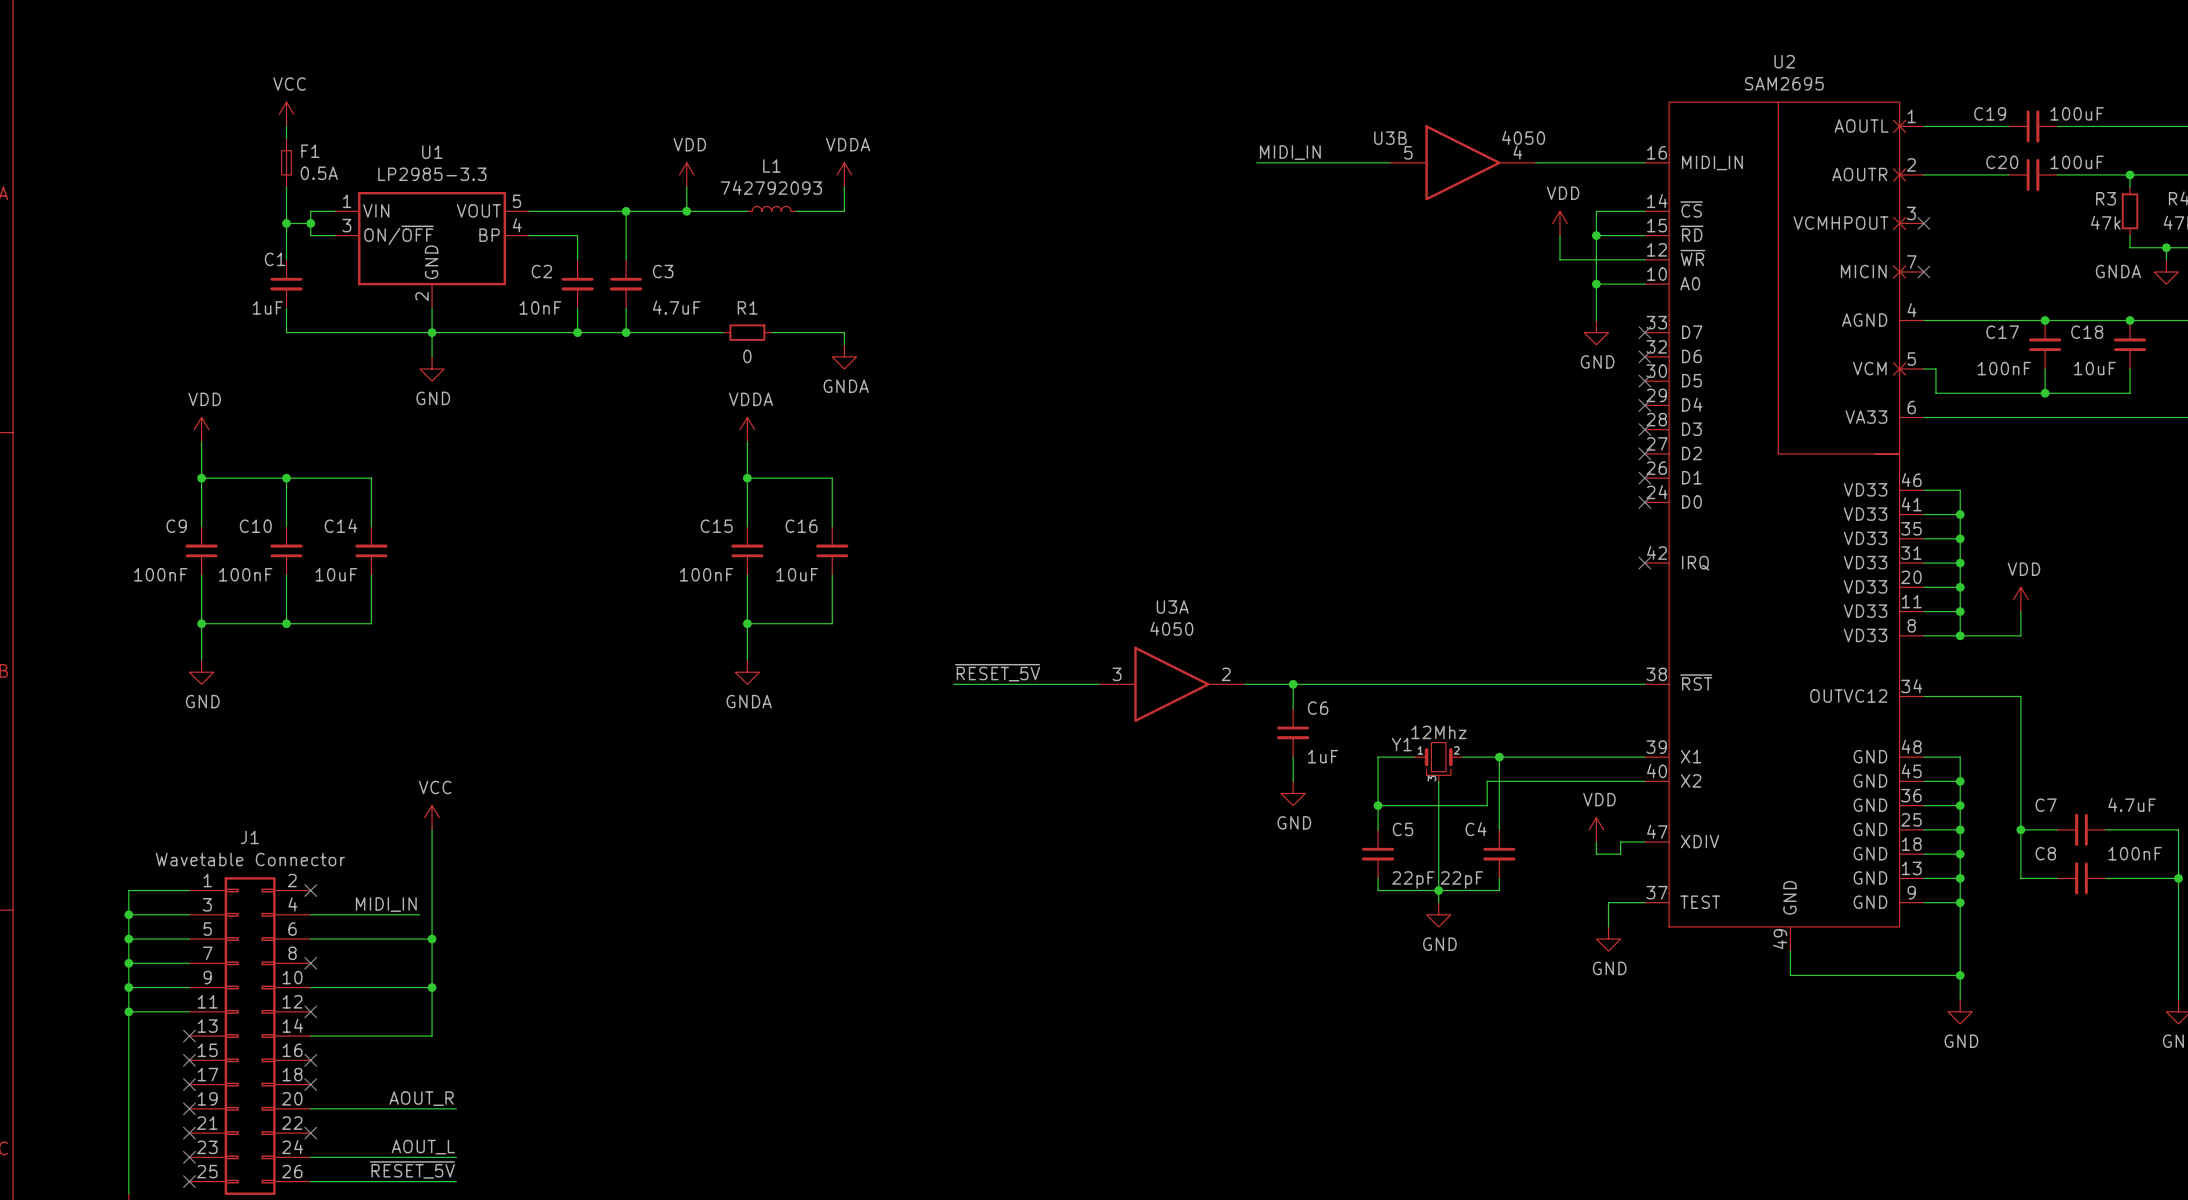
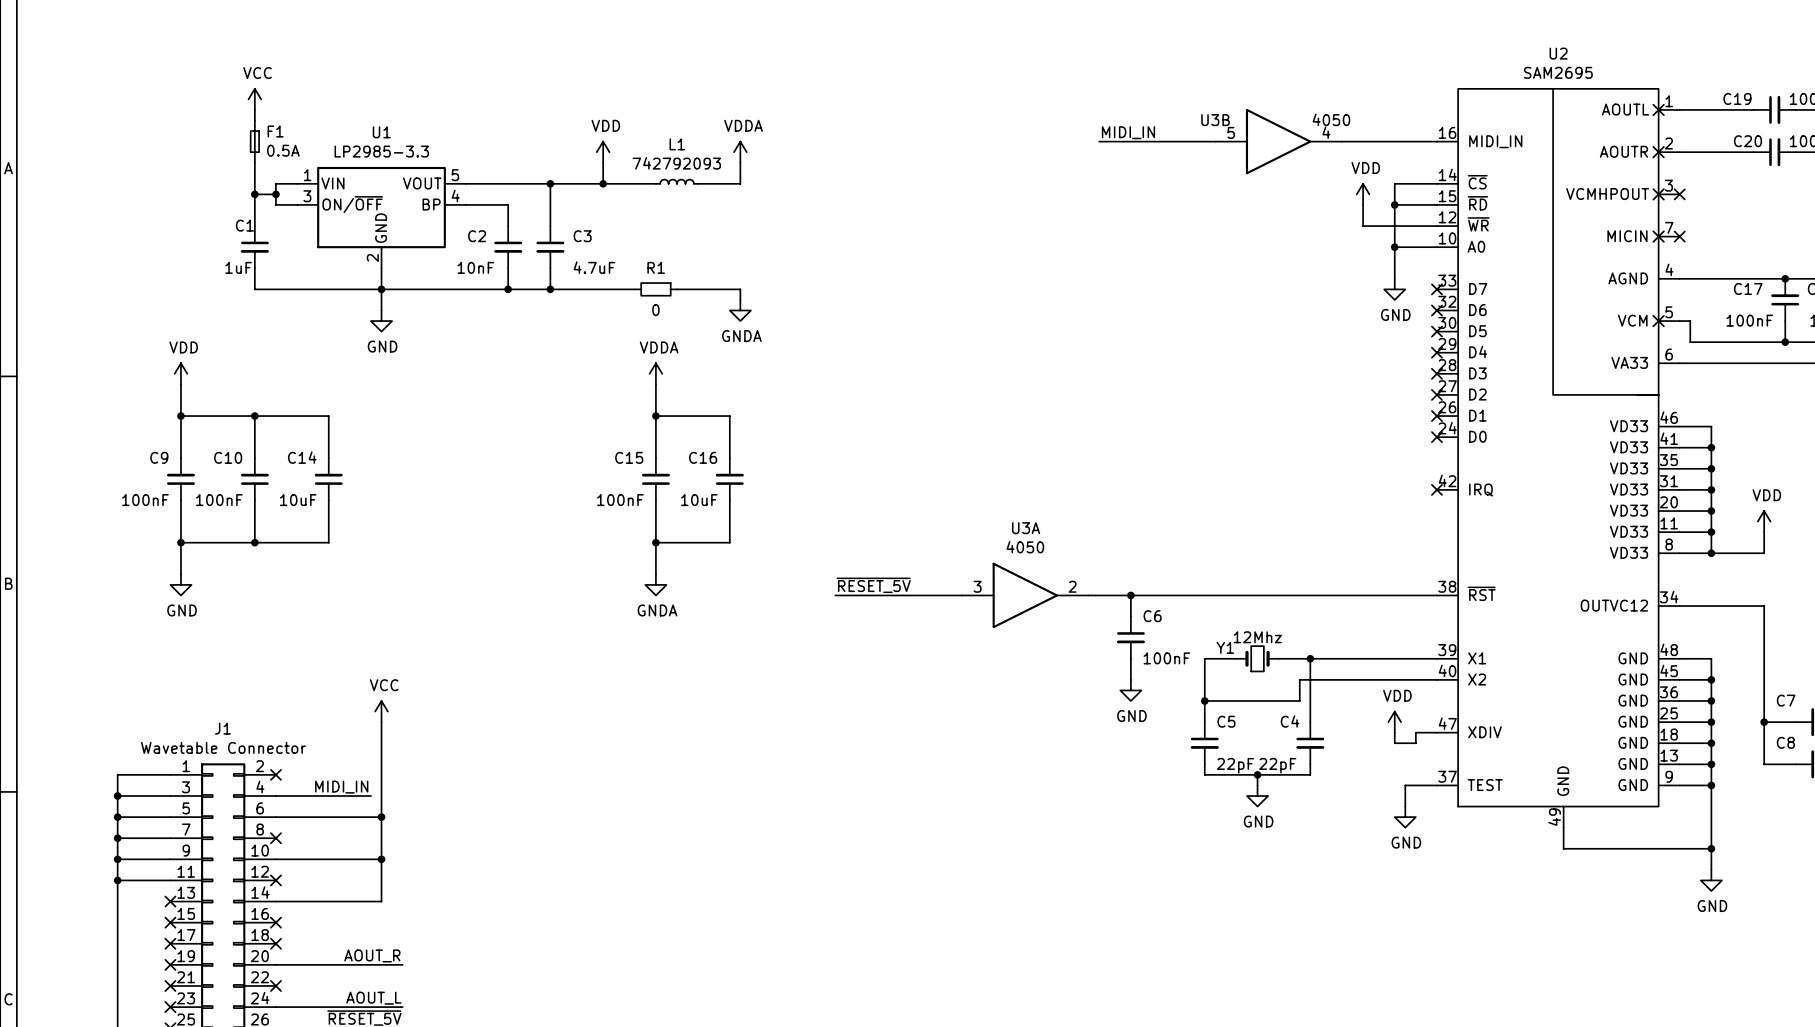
Y1 symbol: [1414, 742, 1463, 782] -> [1236, 646, 1279, 672]
C6 value: 1uF (1323, 756) -> 100nF (1166, 658)
wire: (1438, 781) (1438, 890) -> none

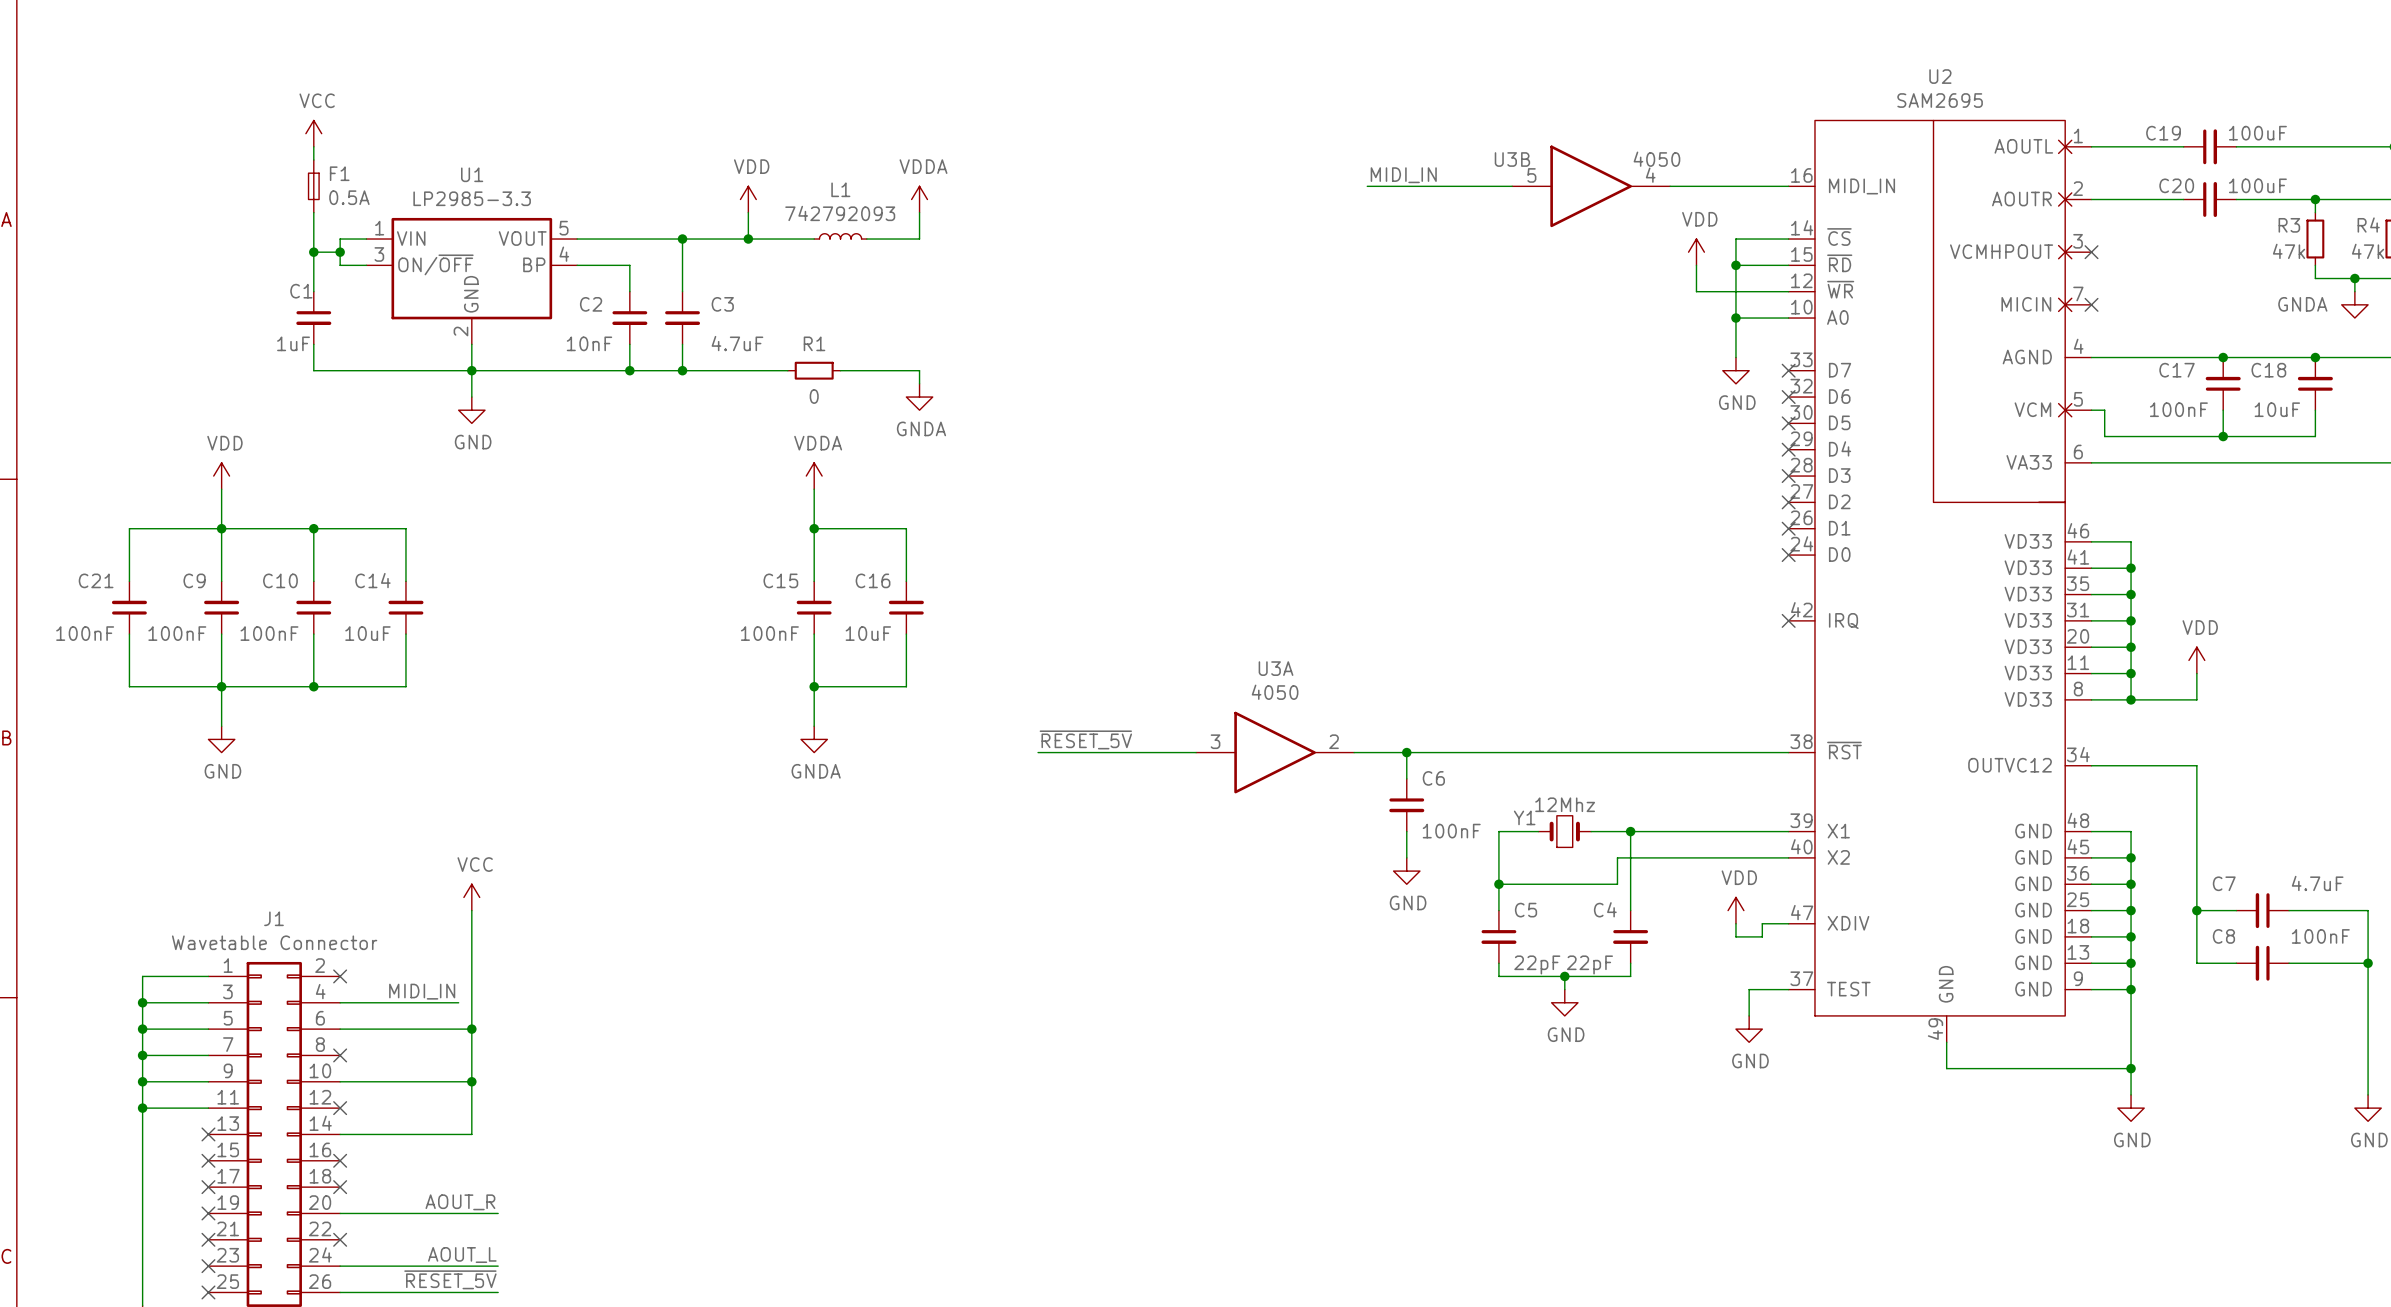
wire: none -> (221, 528) (129, 528) (129, 581)
C21: none -> 100nF (129, 607)
wire: none -> (129, 634) (129, 686) (221, 686)

